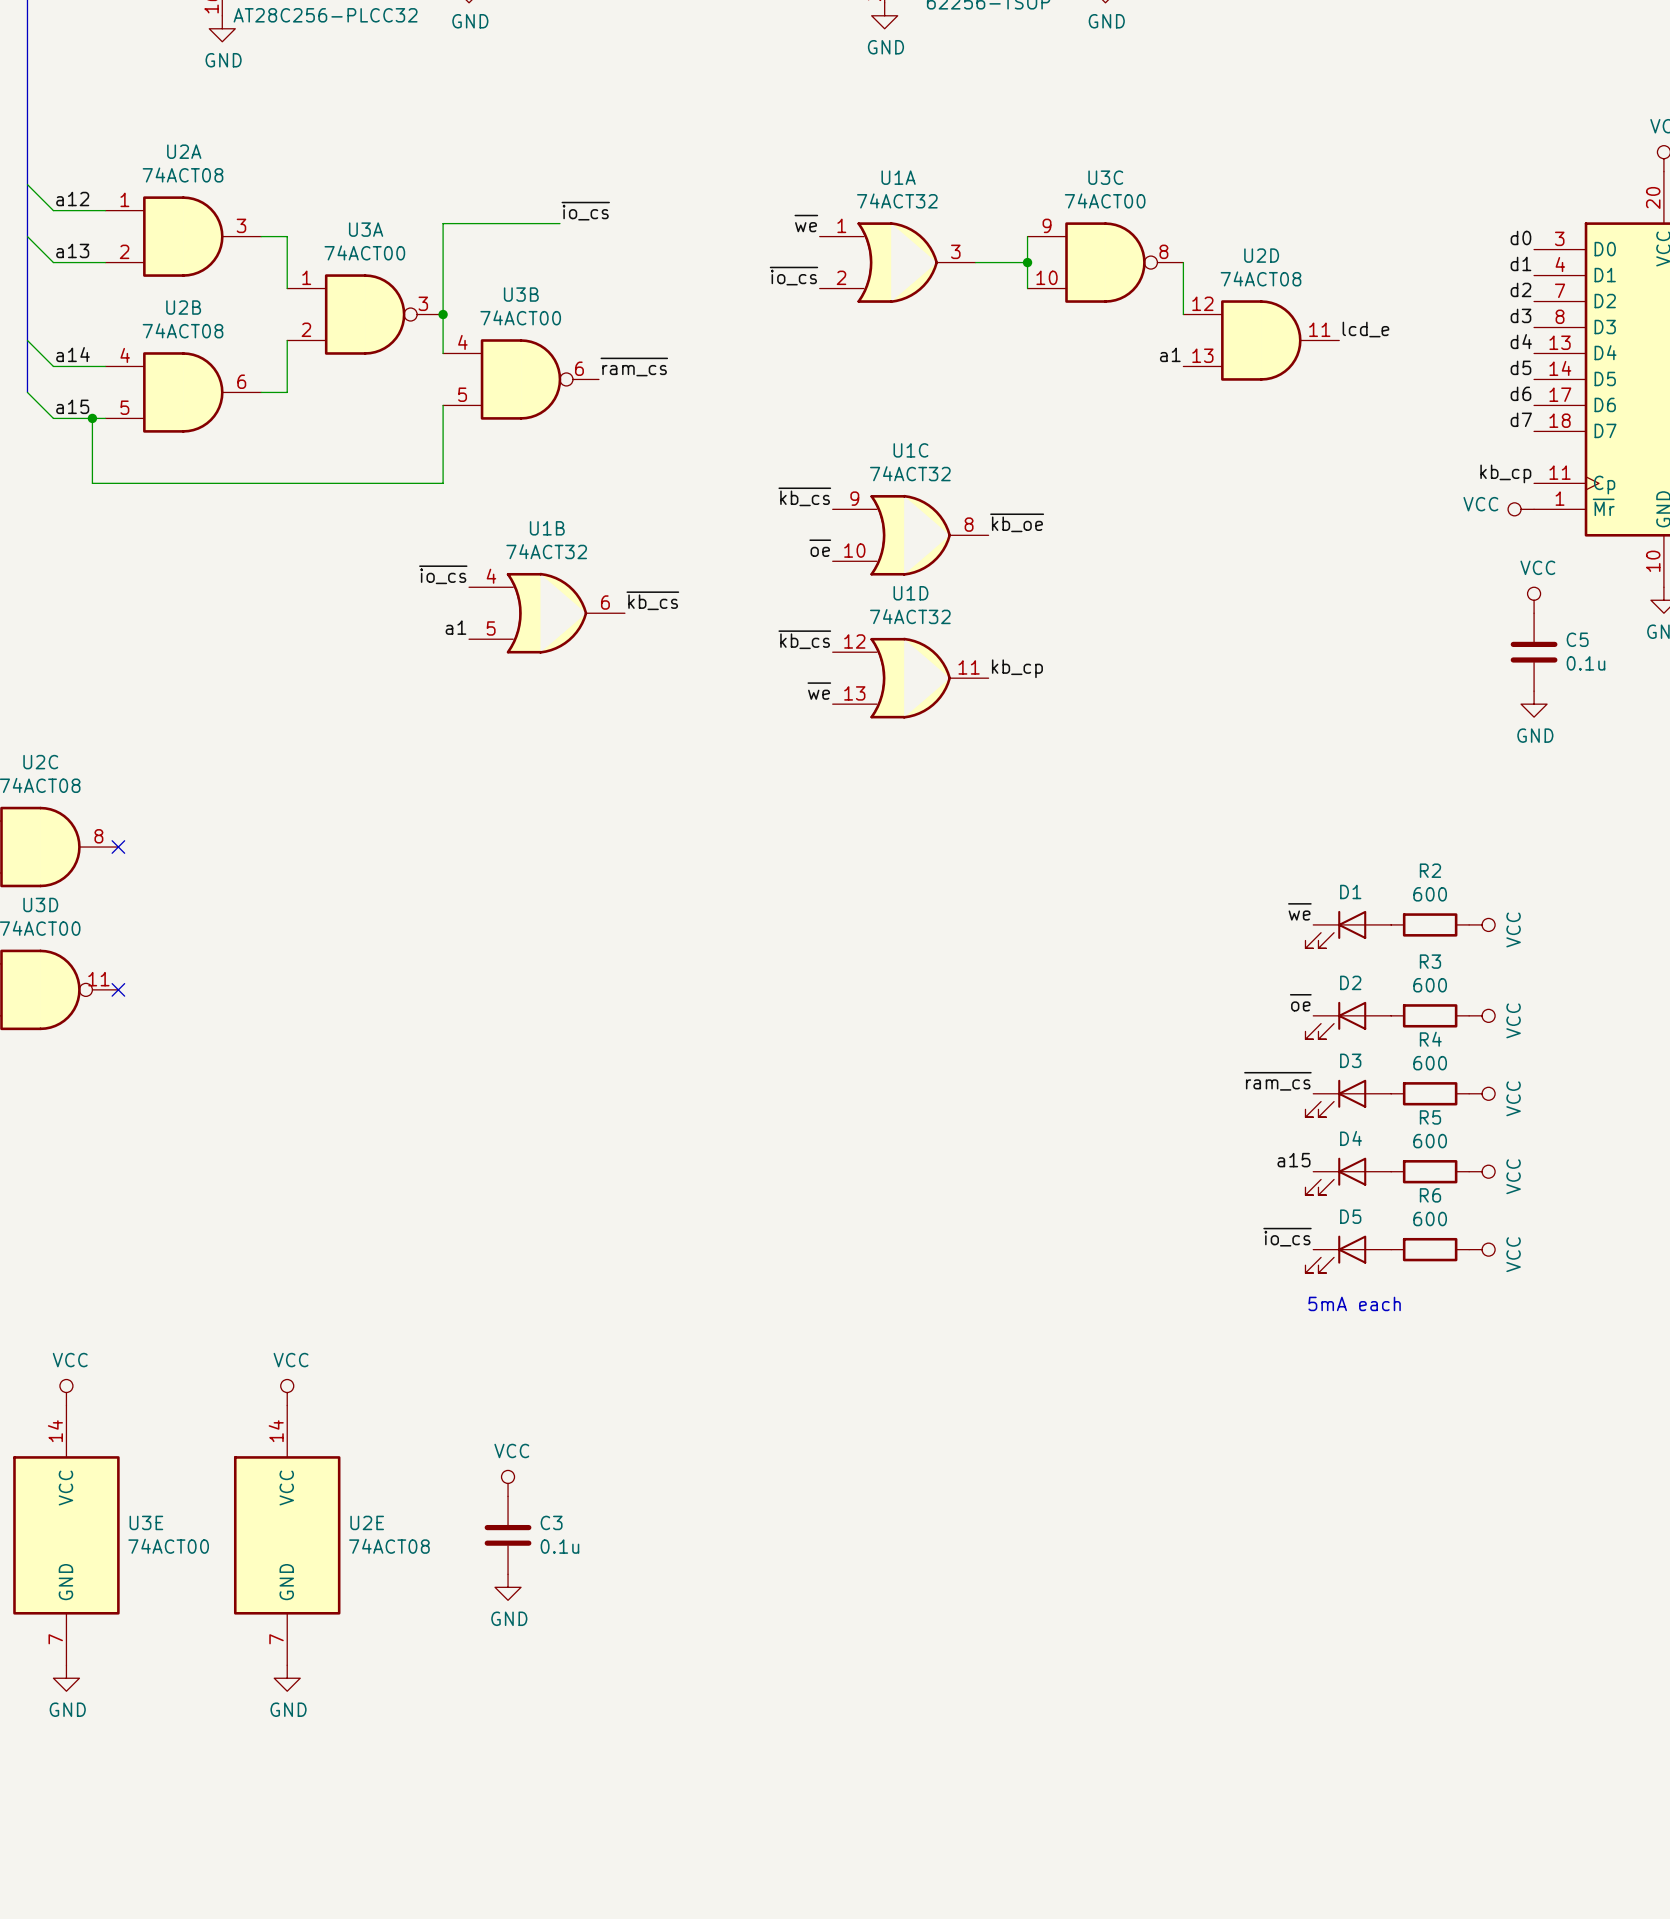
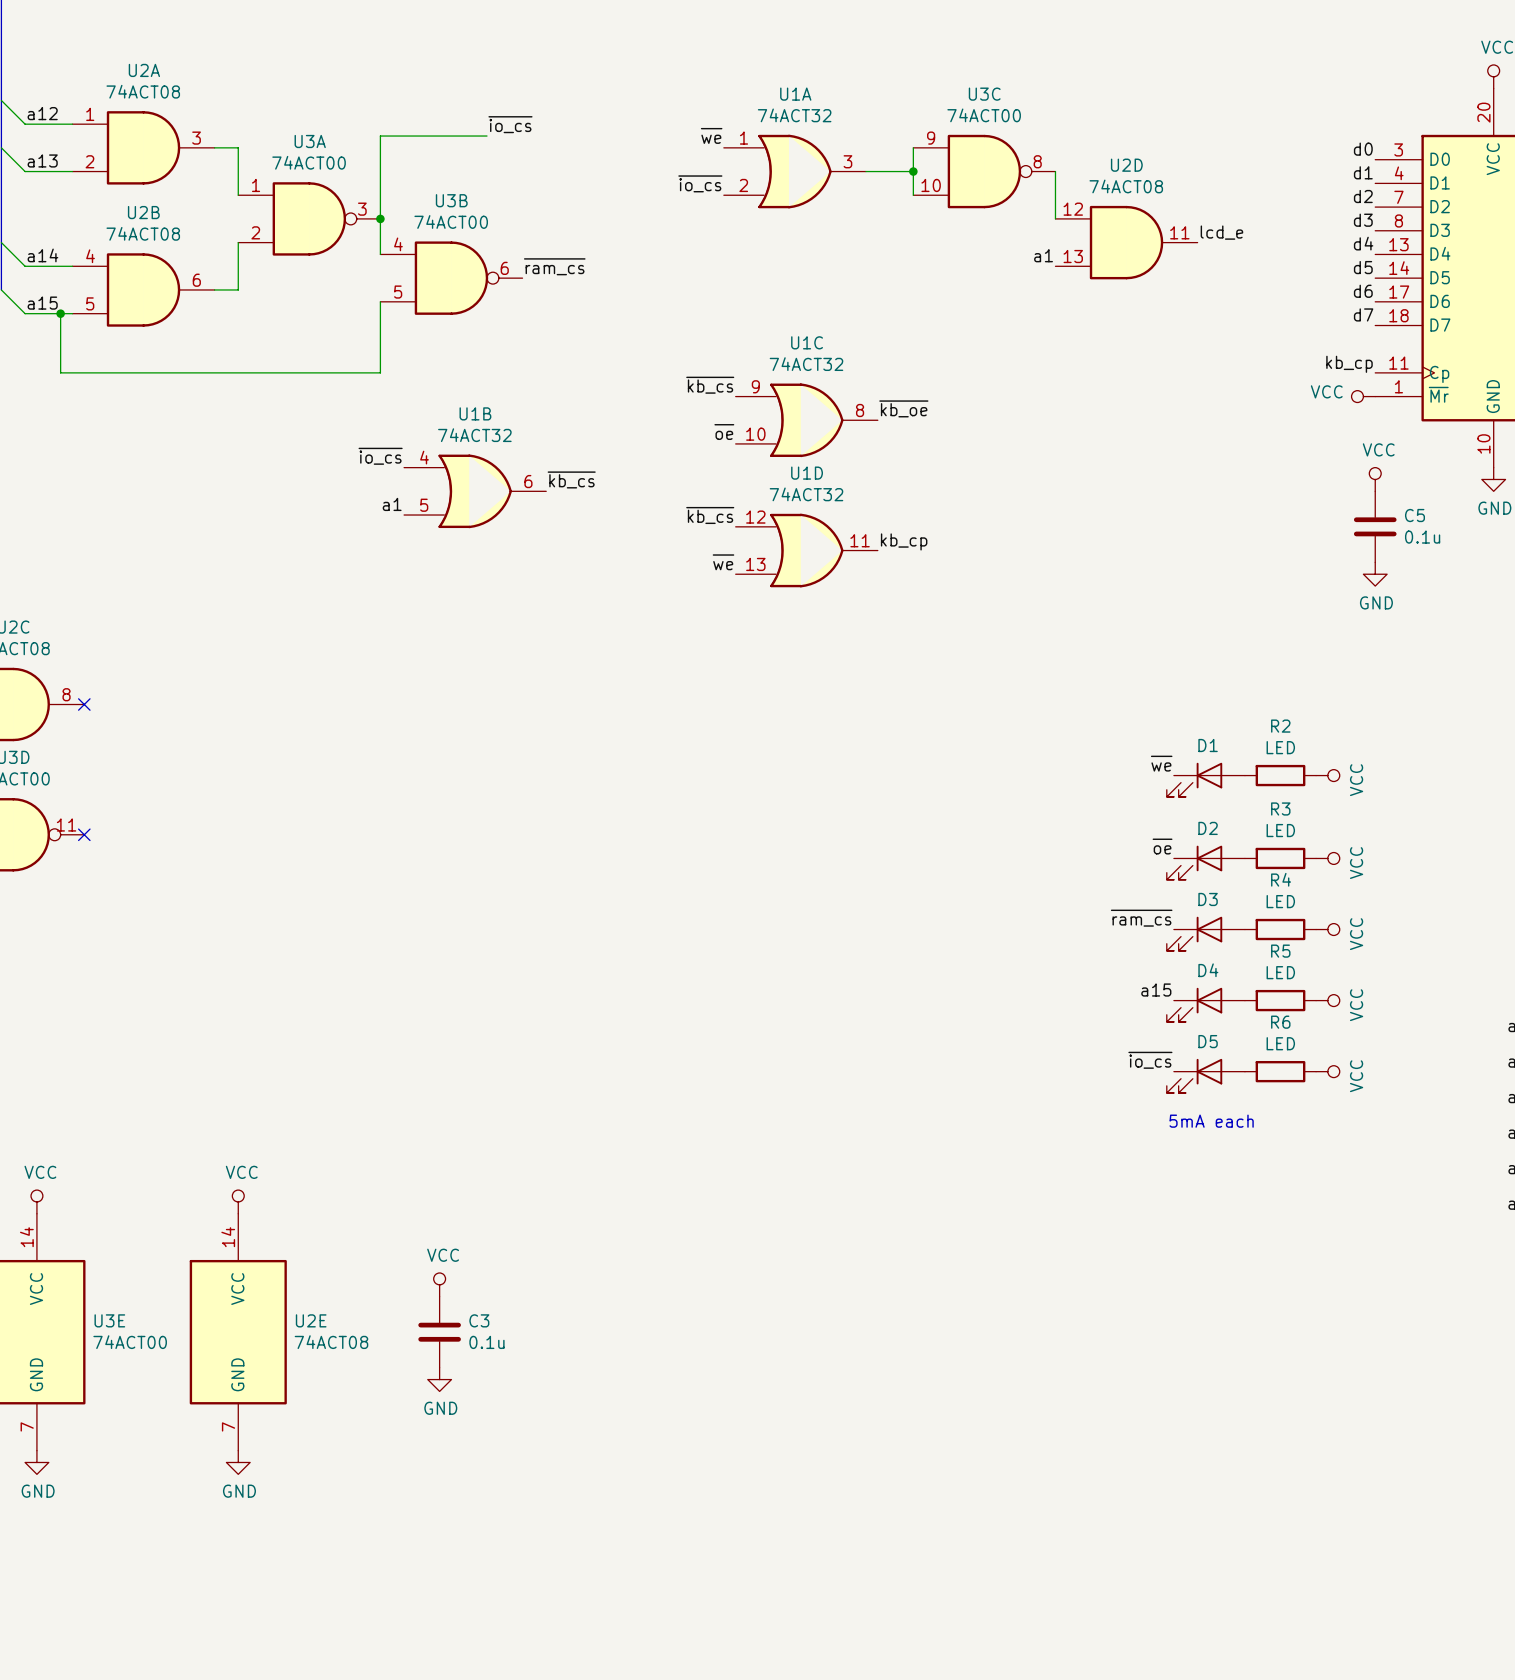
R2 value: 600 (1430, 894) -> LED (1280, 747)
R3 value: 600 (1430, 985) -> LED (1280, 830)
R4 value: 600 (1430, 1063) -> LED (1280, 901)
R5 value: 600 (1430, 1141) -> LED (1280, 972)
R6 value: 600 (1430, 1219) -> LED (1280, 1043)

